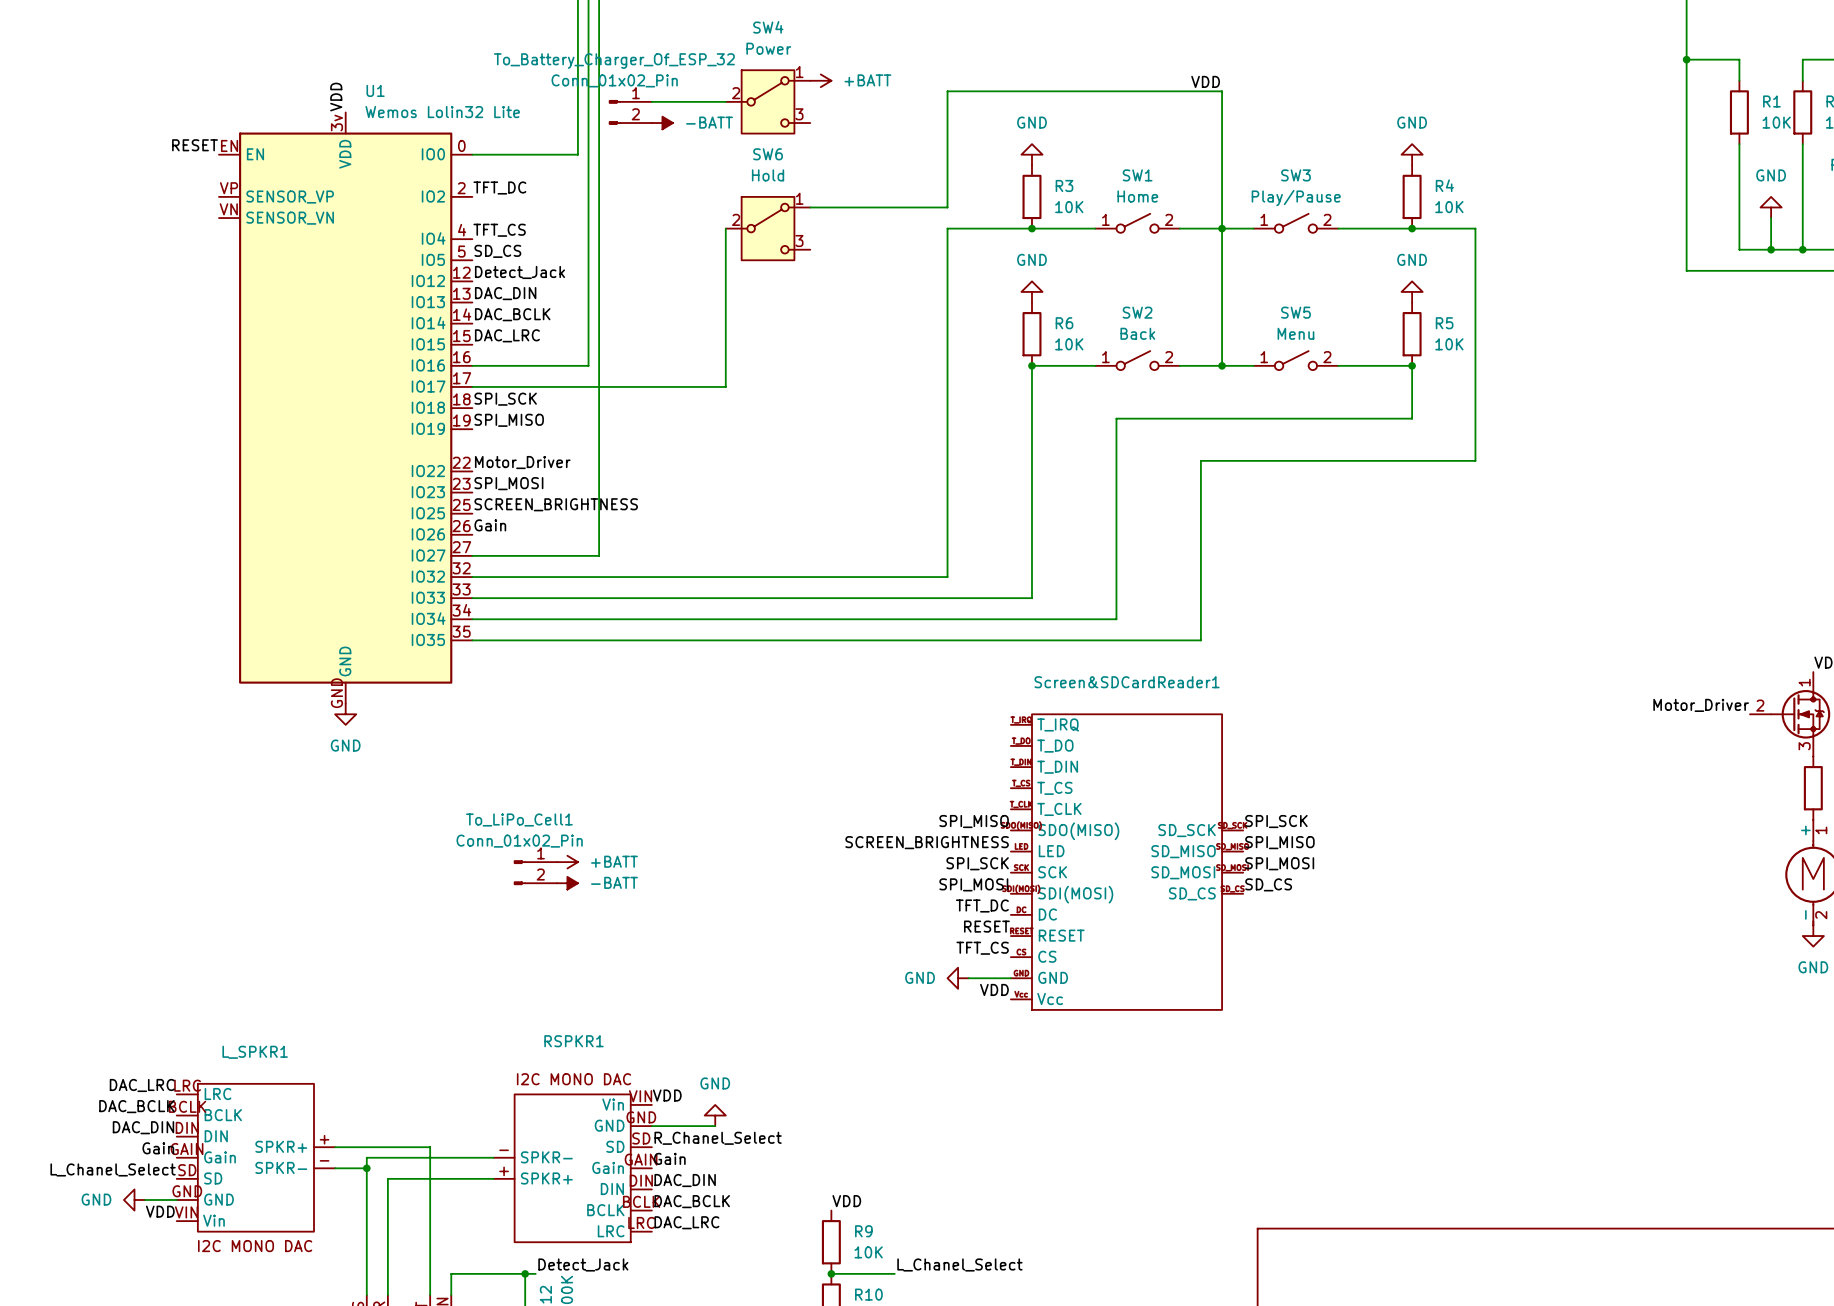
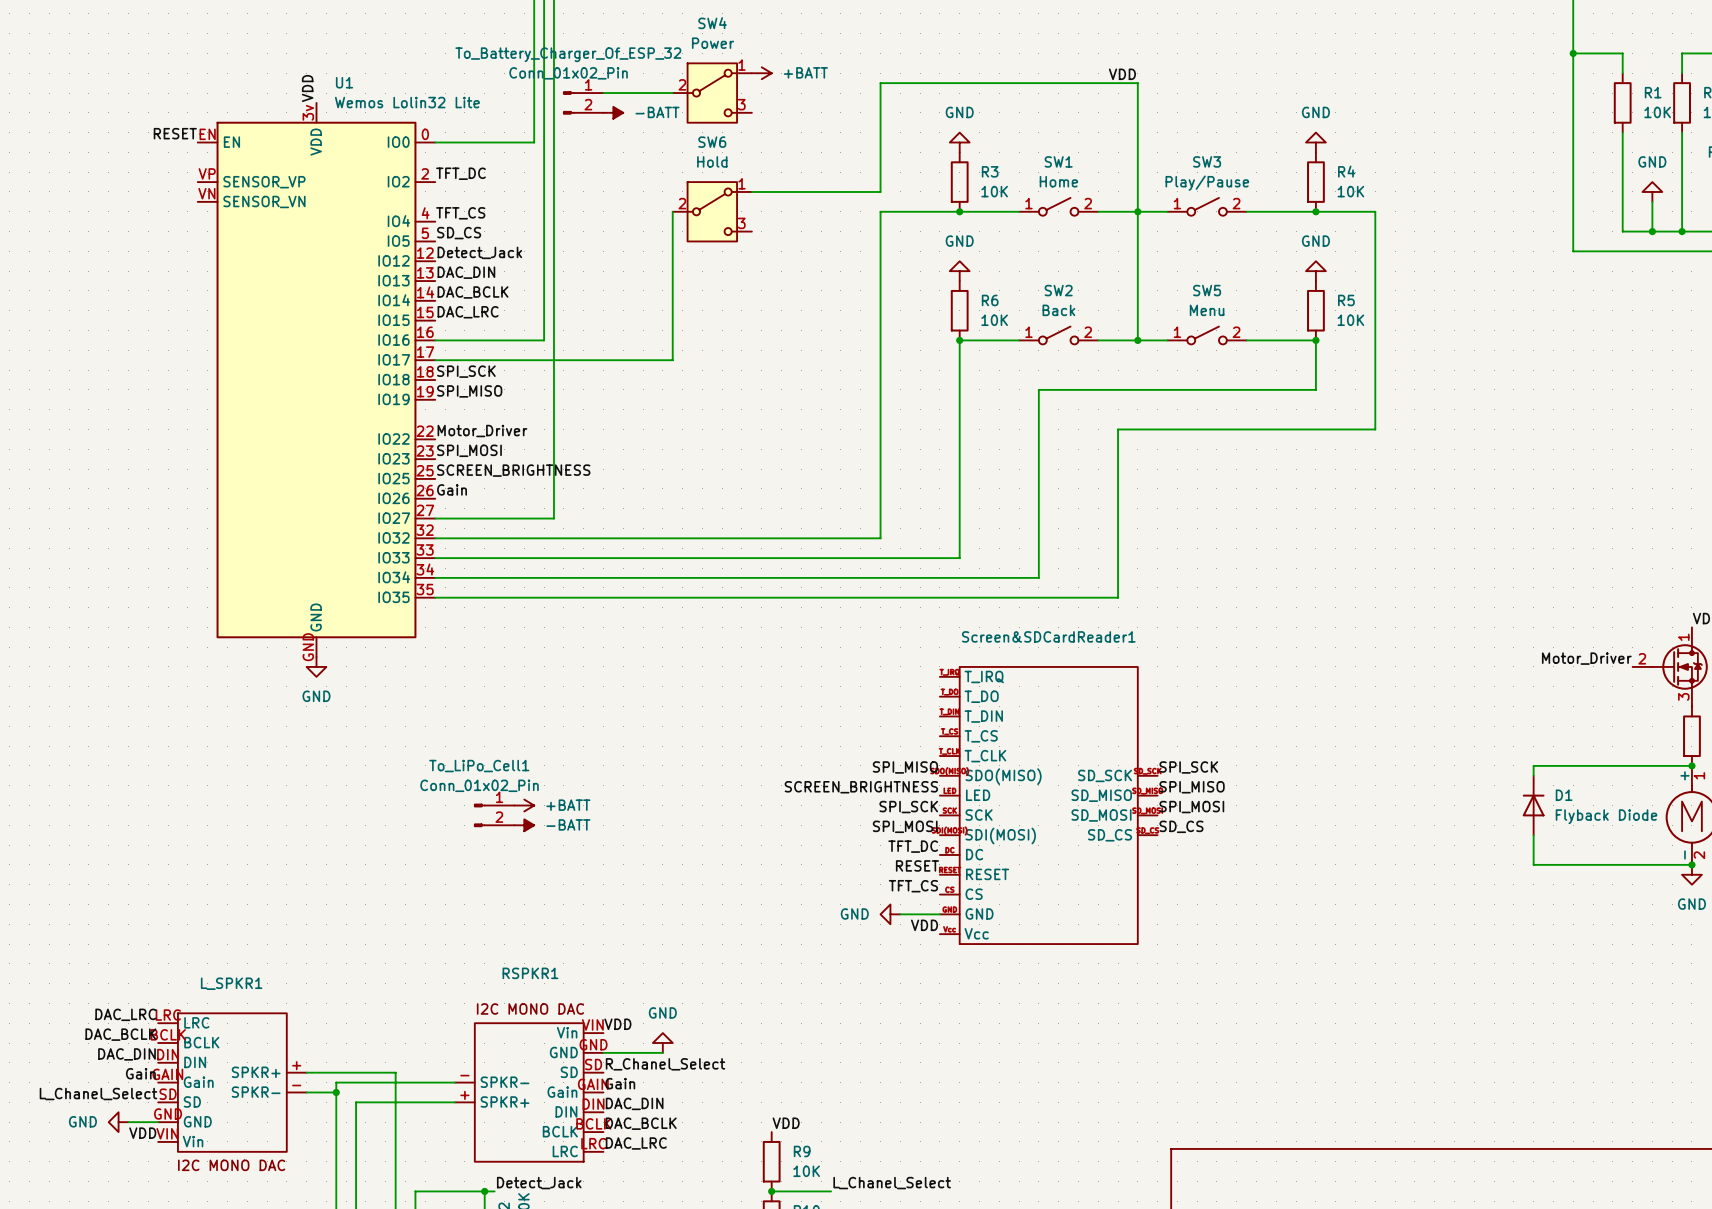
wire: none -> (1691, 765) (1533, 765) (1533, 775)
junction: none -> (1691, 765)
D1: none -> Flyback Diode (1533, 805)
wire: none -> (1533, 835) (1533, 864) (1691, 864)
junction: none -> (1691, 864)

